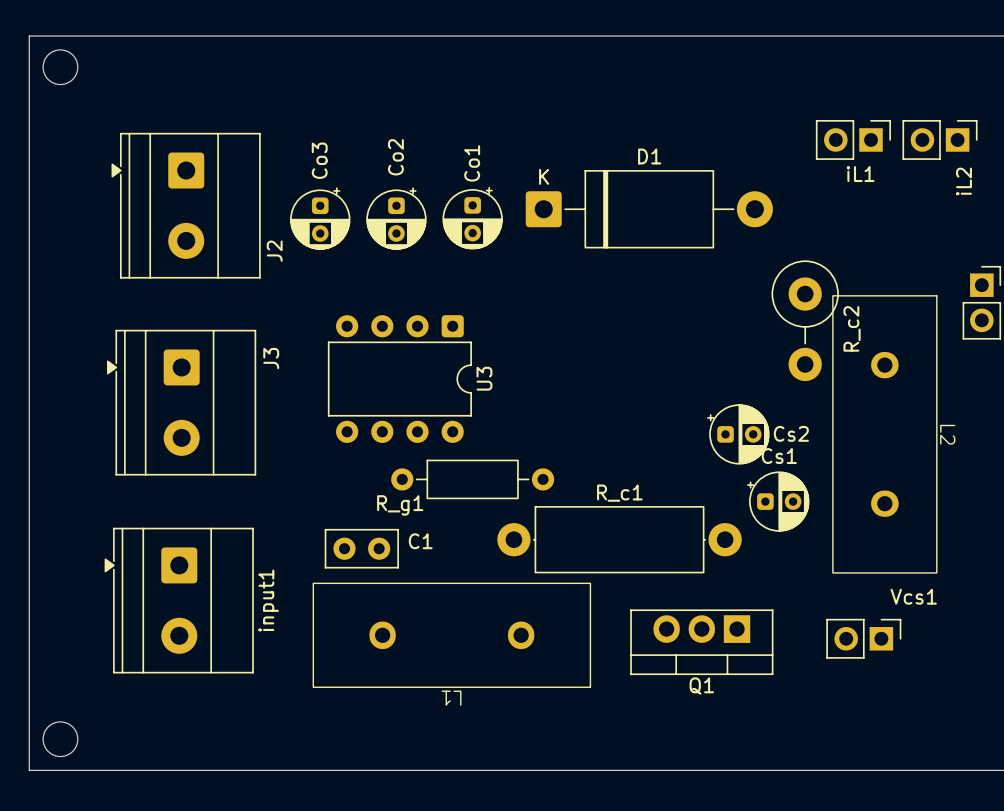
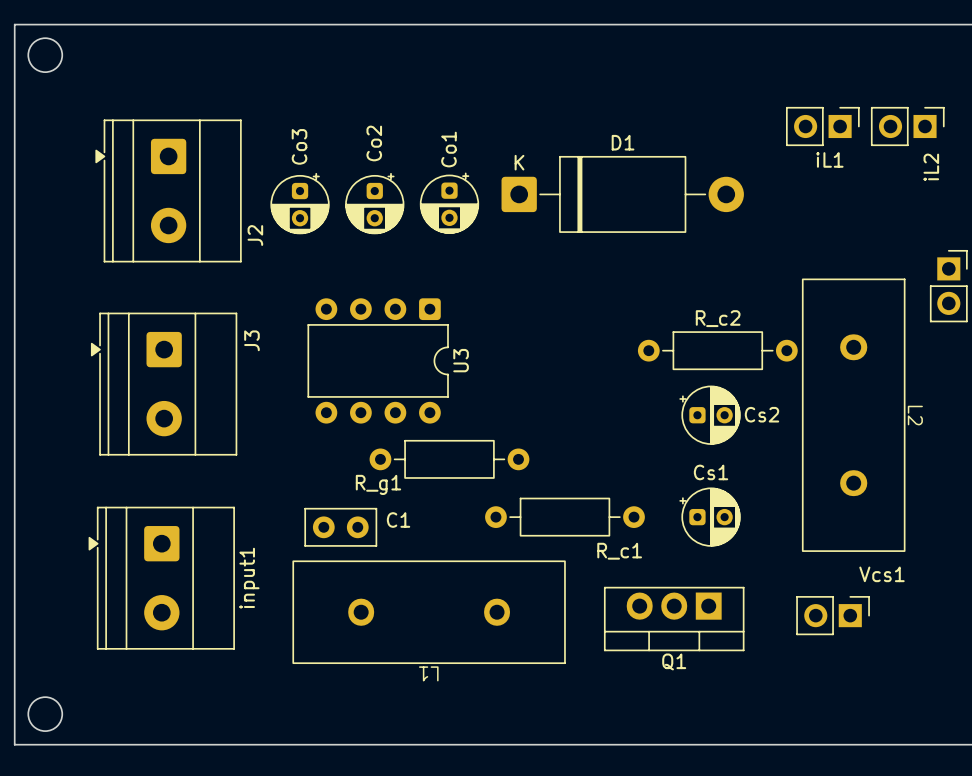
R_c2 footprint: [771, 260, 839, 382] -> [637, 331, 798, 371]
R_c2 name position: R_c2 (852, 328) -> R_c2 (718, 318)
R_c1 name position: R_c1 (619, 493) -> R_c1 (619, 551)
Cs1 position: (778, 501) -> (710, 517)
R_c1 footprint: [497, 506, 742, 574] -> [485, 497, 645, 537]

